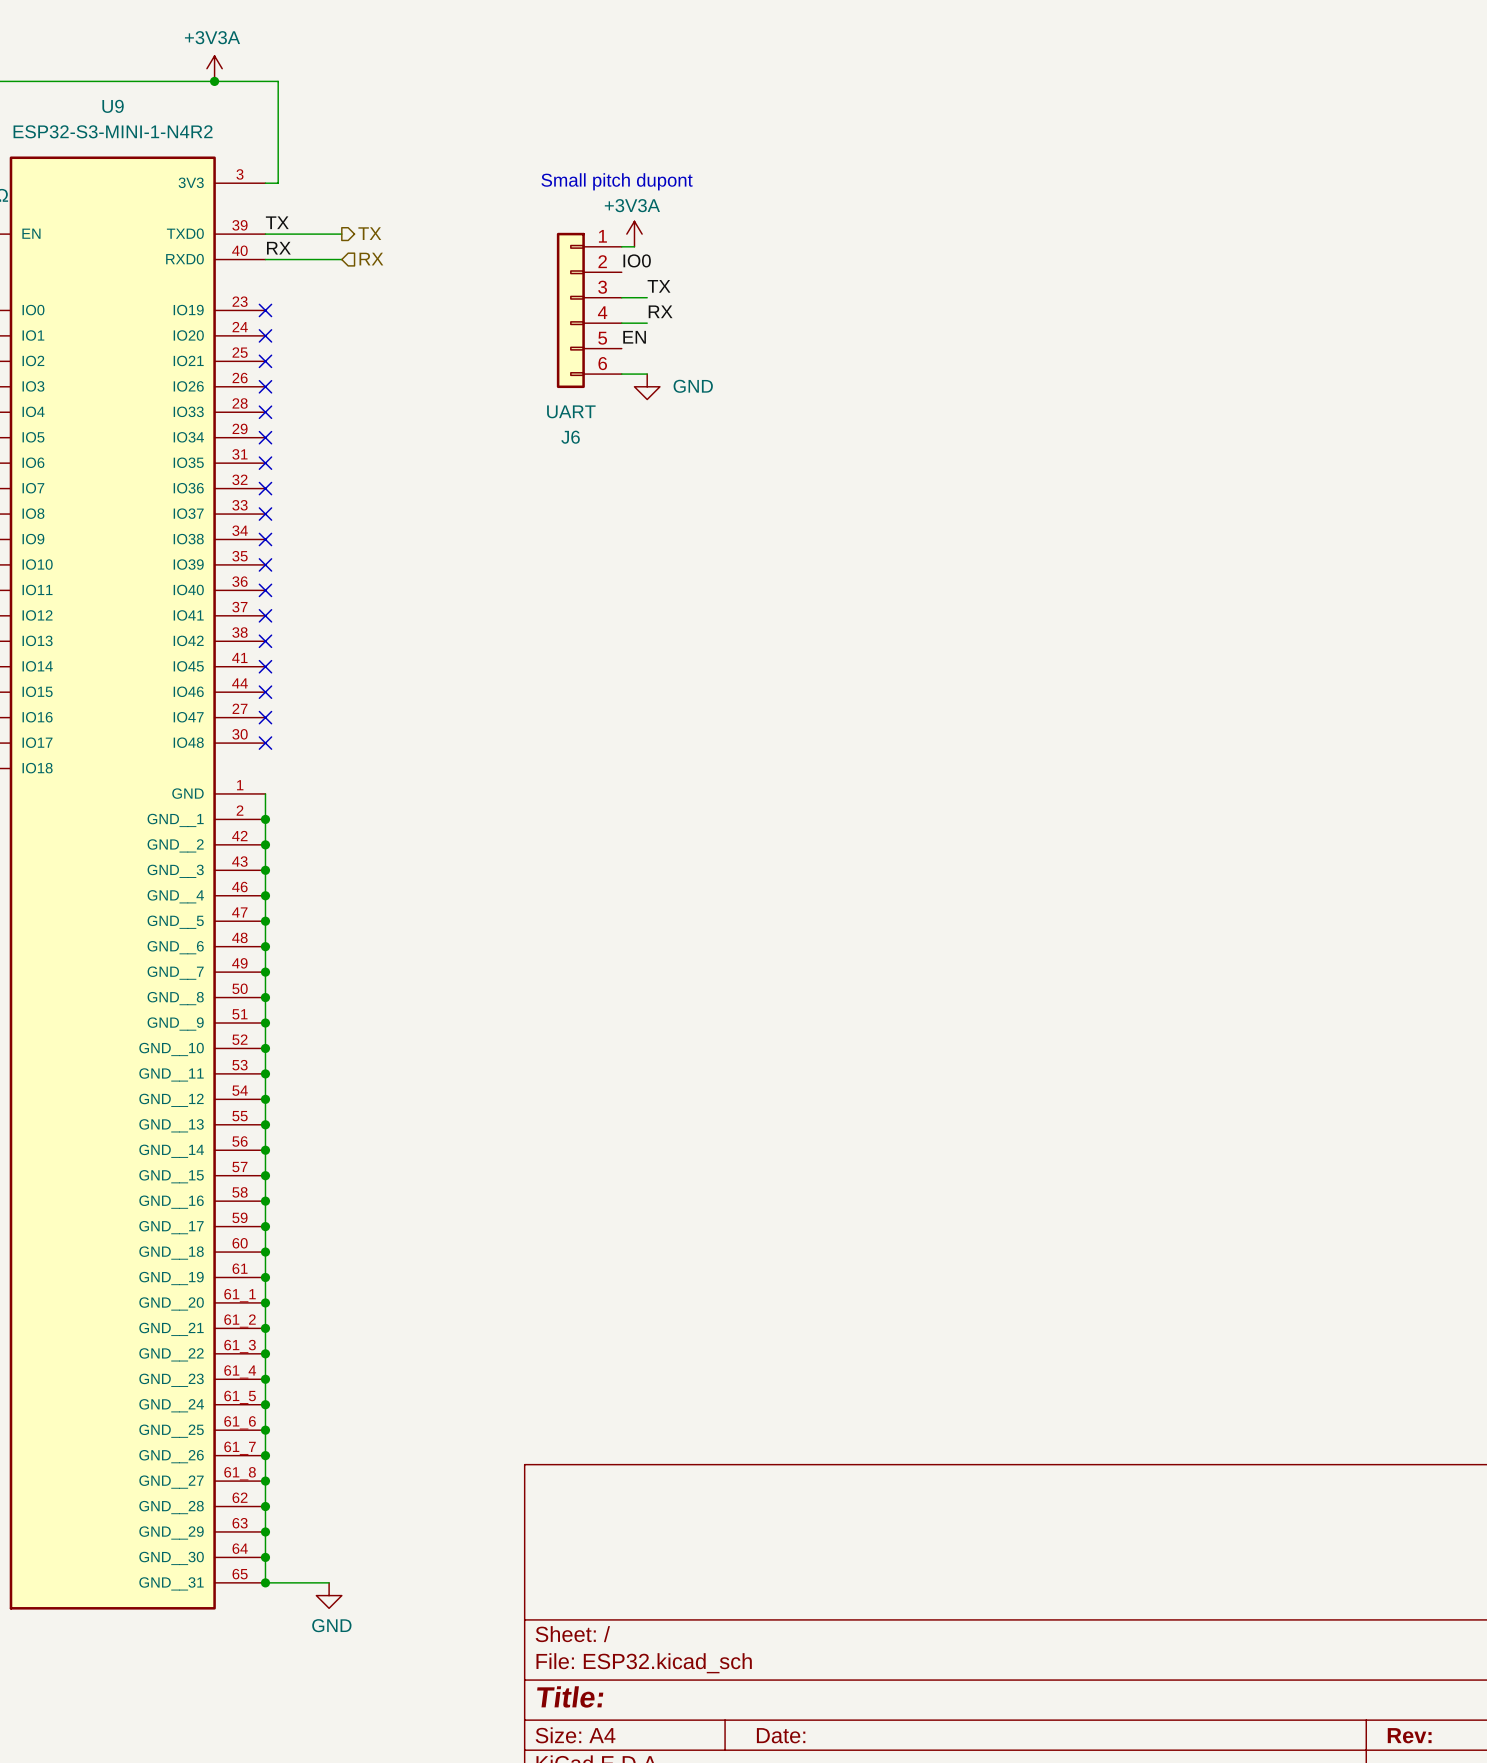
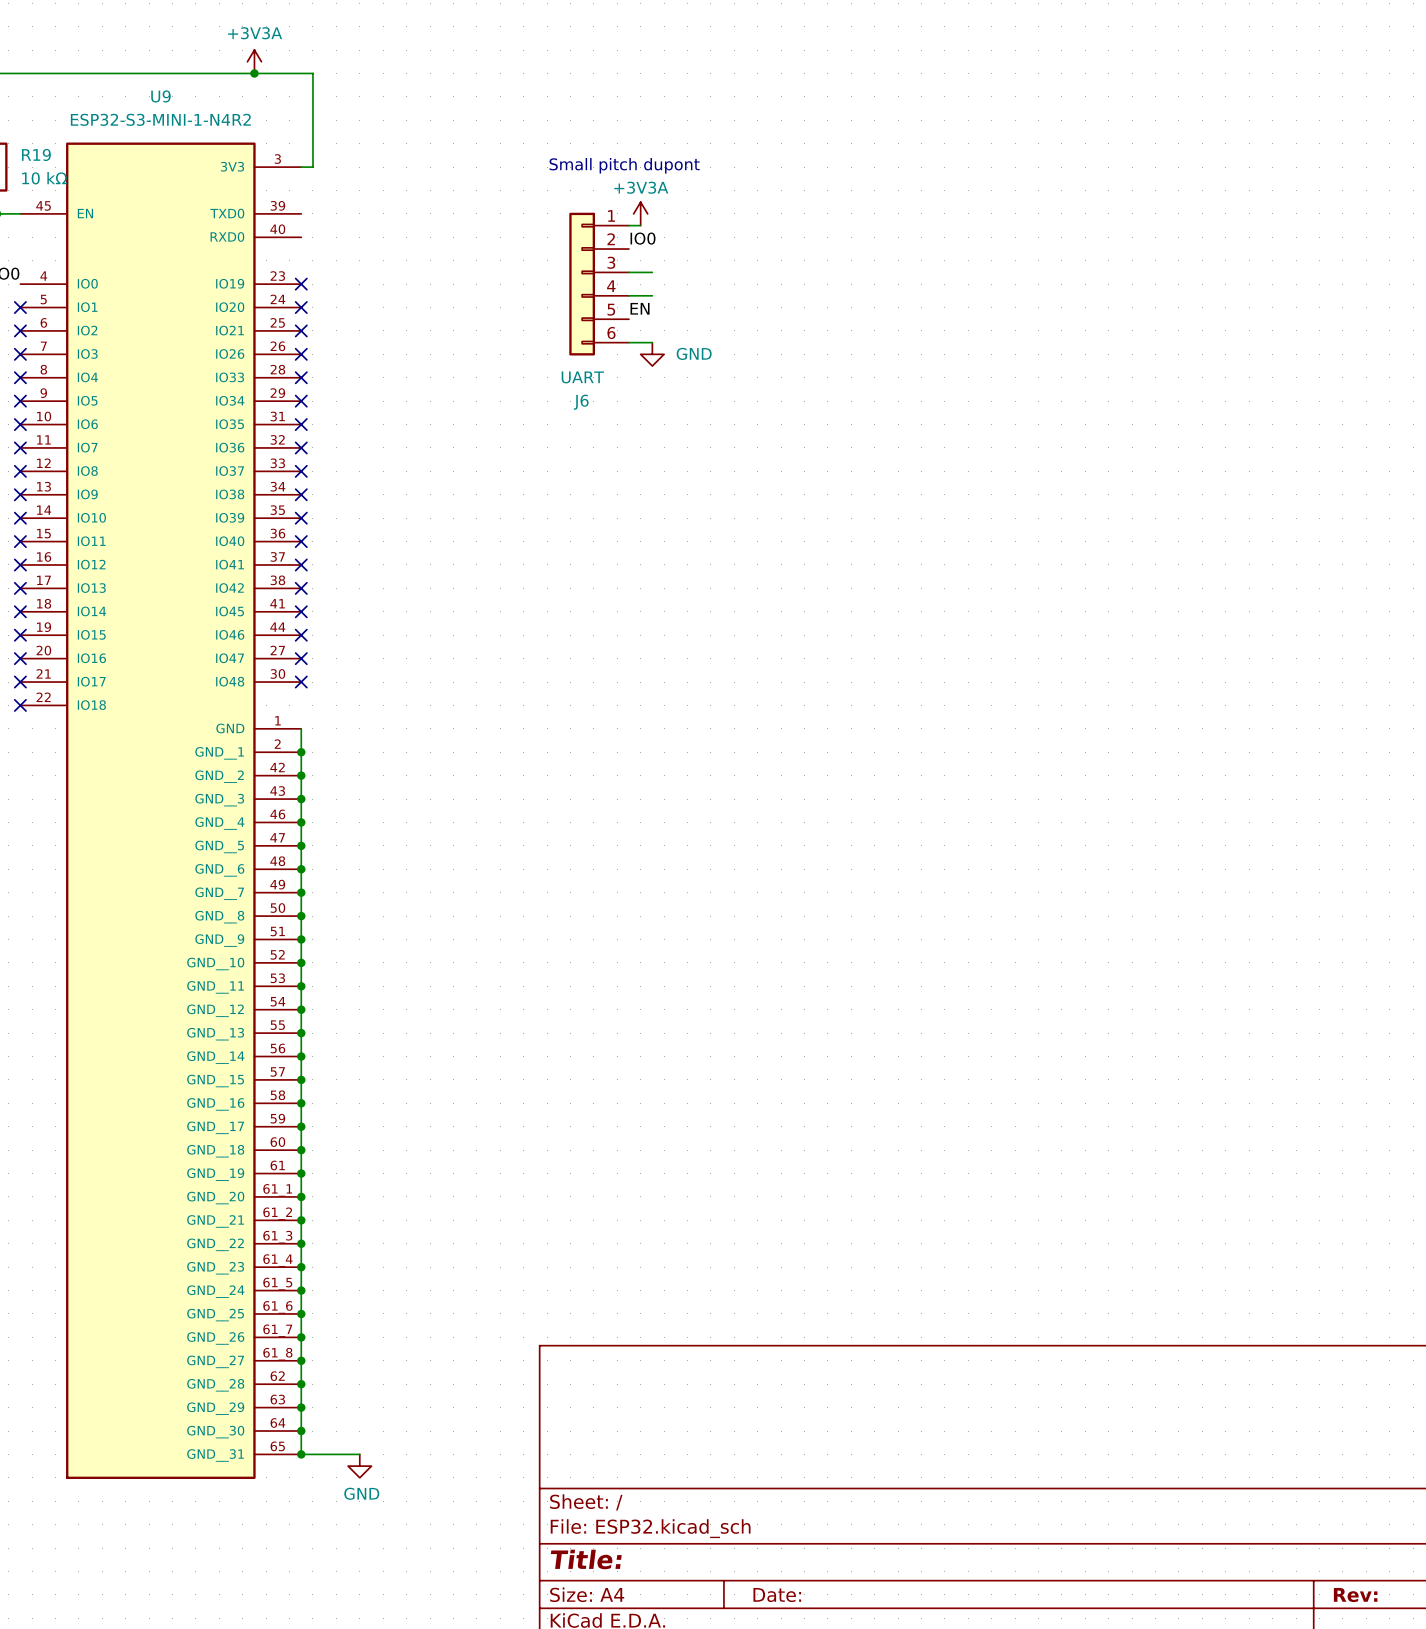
label: TX (277, 222) -> none
hierarchical label: TX (369, 233) -> none
wire: (265, 234) (341, 234) -> none
label: RX (278, 248) -> none
wire: (265, 259) (341, 259) -> none
hierarchical label: RX (371, 259) -> none
label: TX (659, 286) -> none
label: RX (660, 311) -> none

